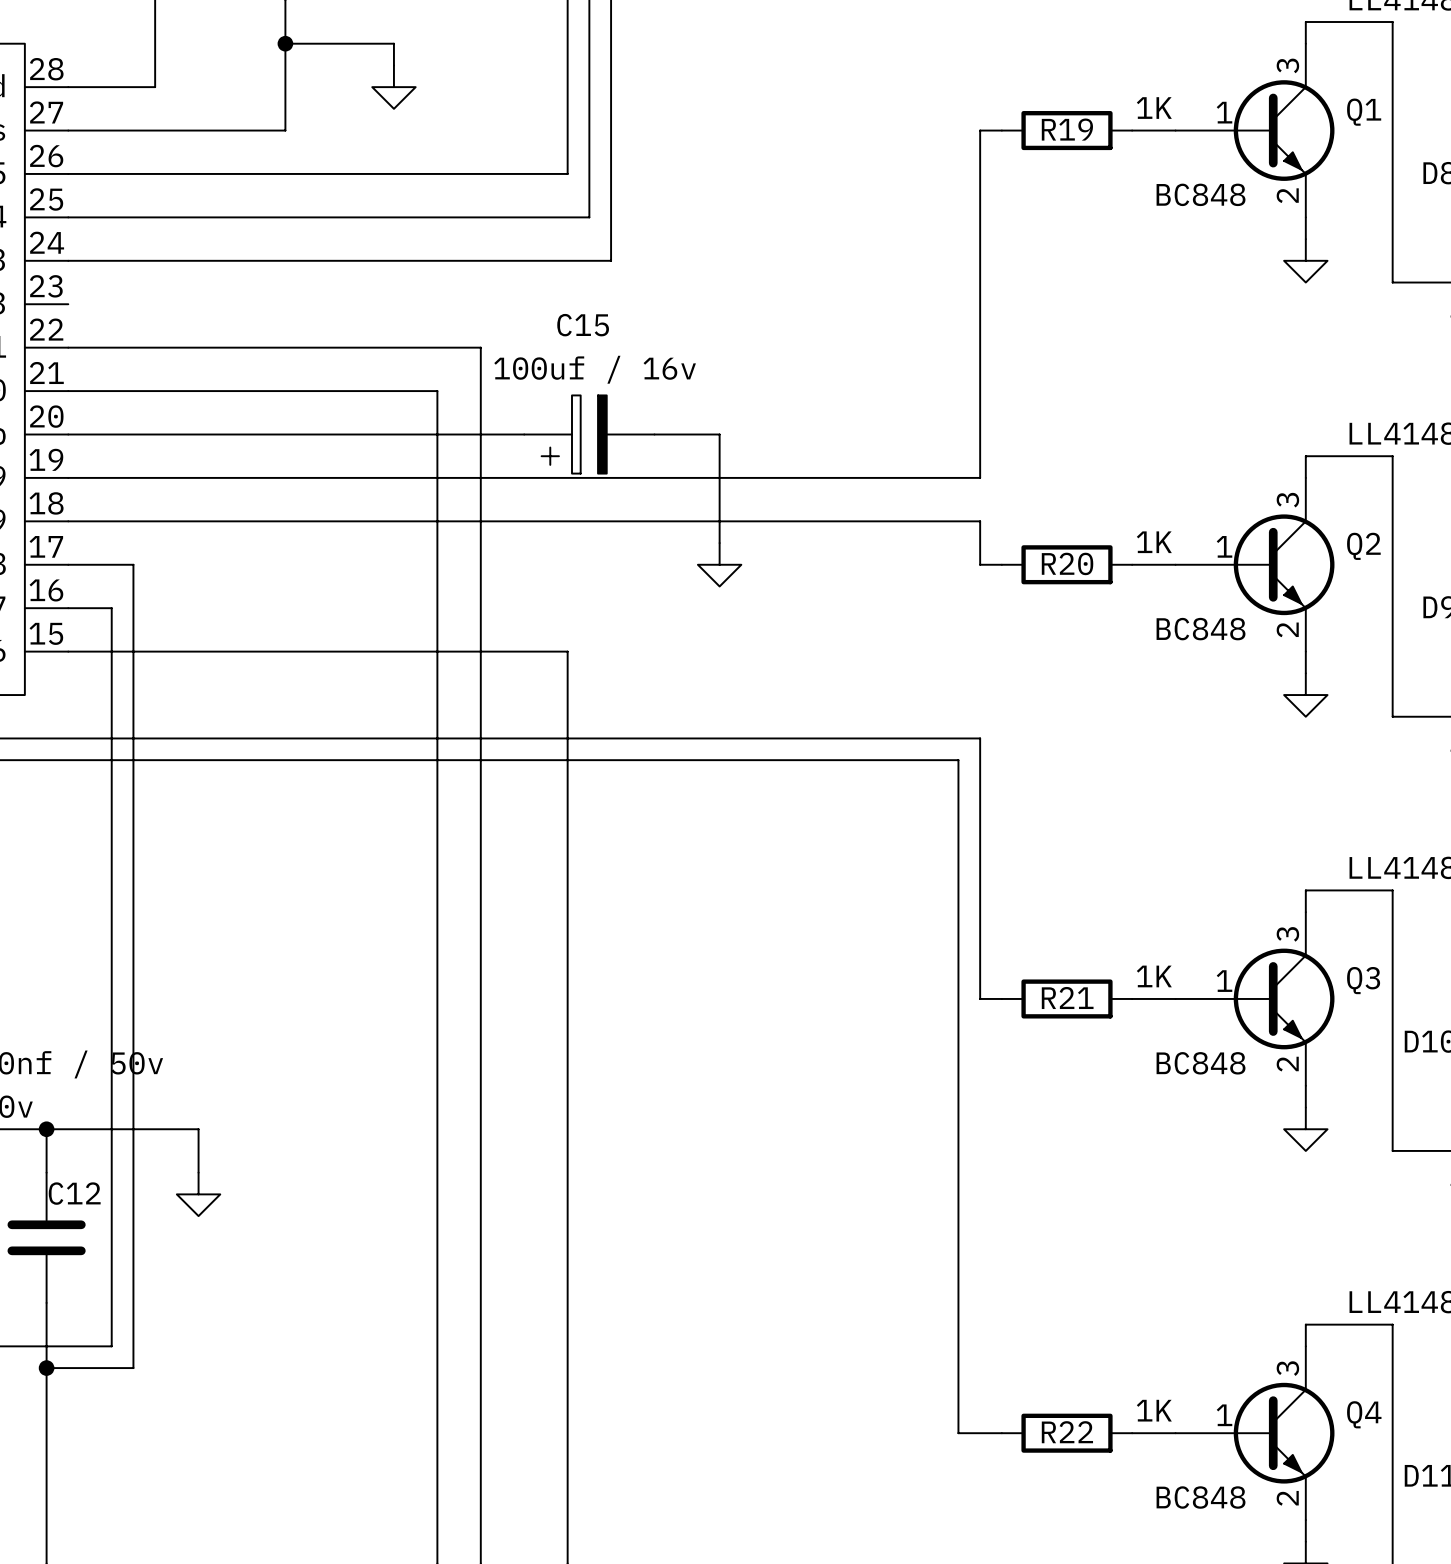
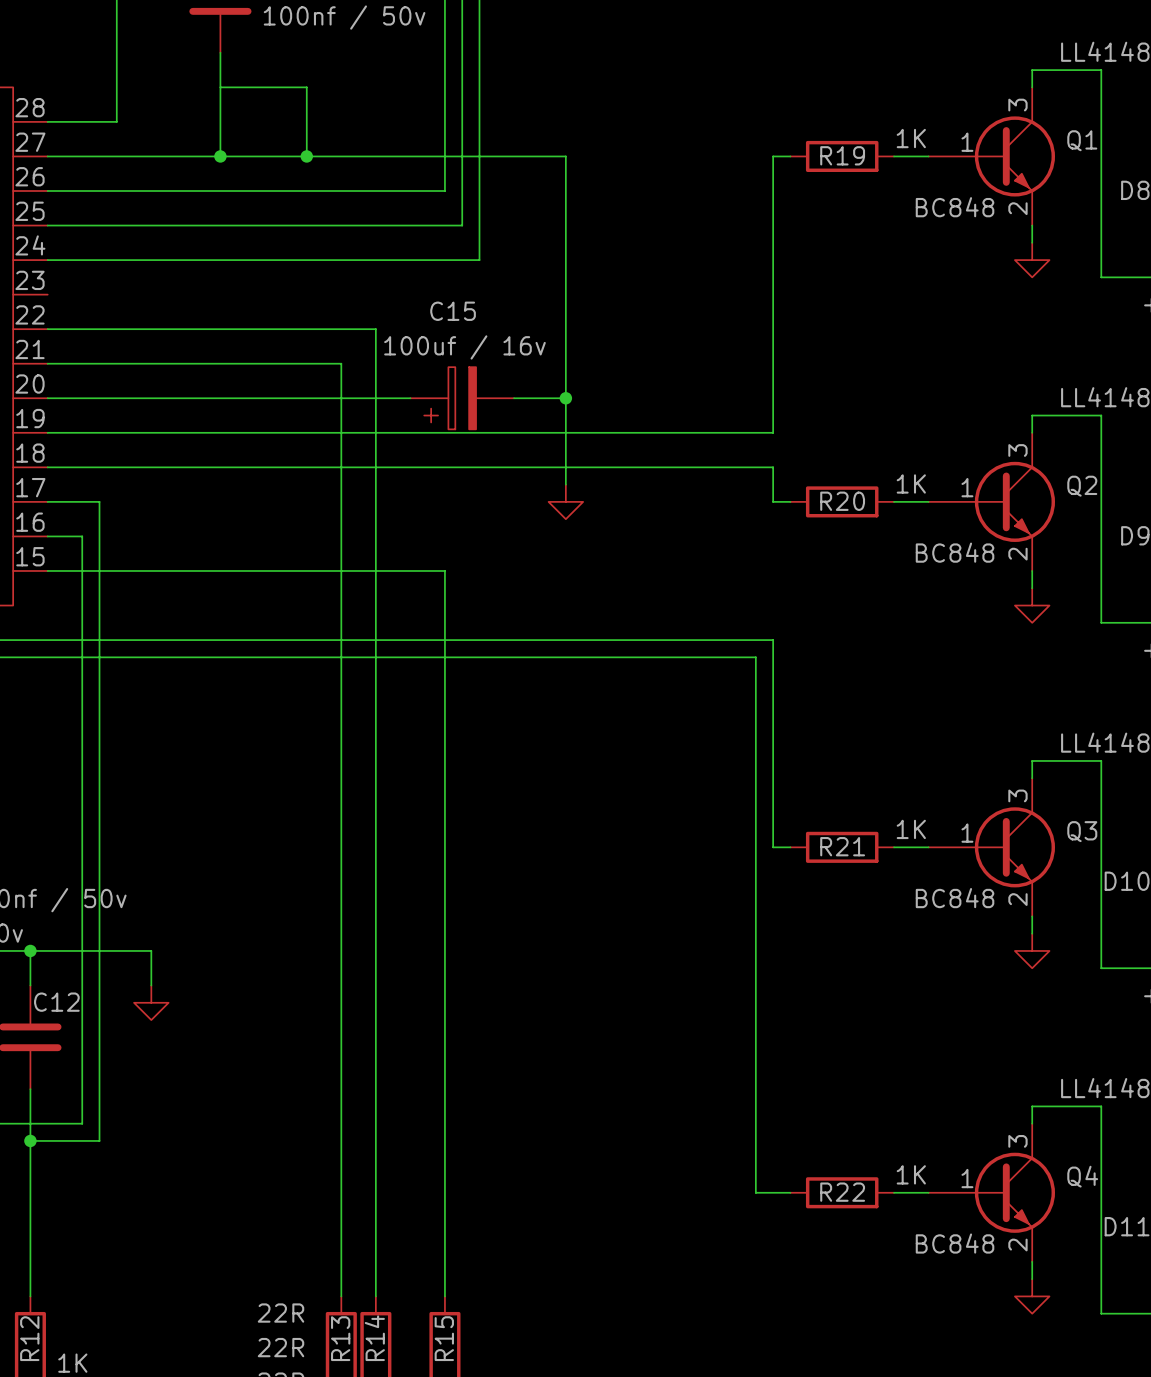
junction: (285, 43) -> none
wire: none -> (306, 104) (306, 156)
power symbol: (393, 87) -> none
wire: none -> (220, 156) (565, 156) (565, 398)
junction: none -> (220, 156)
junction: none -> (306, 156)
junction: none -> (565, 398)

